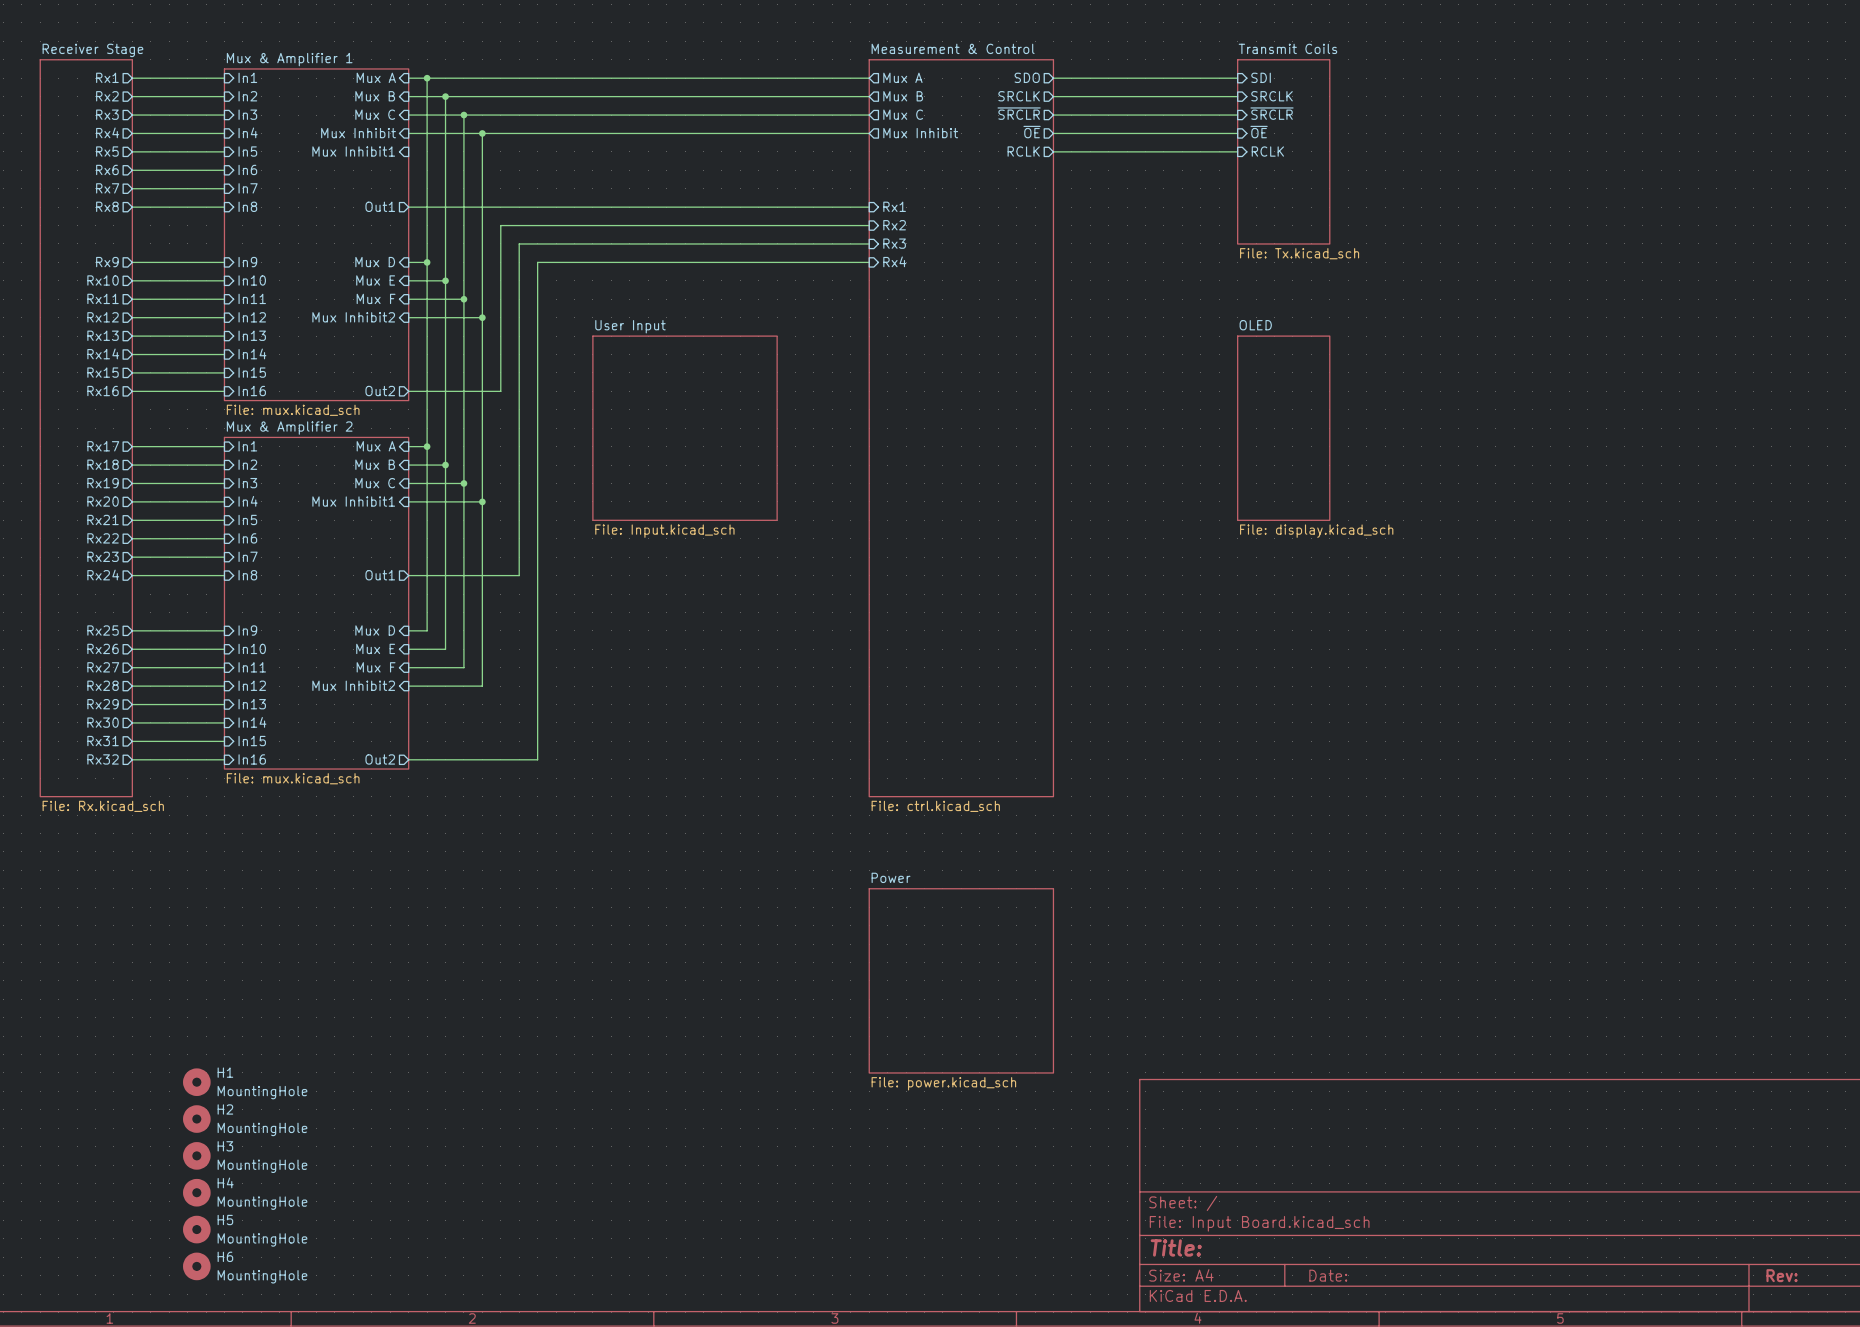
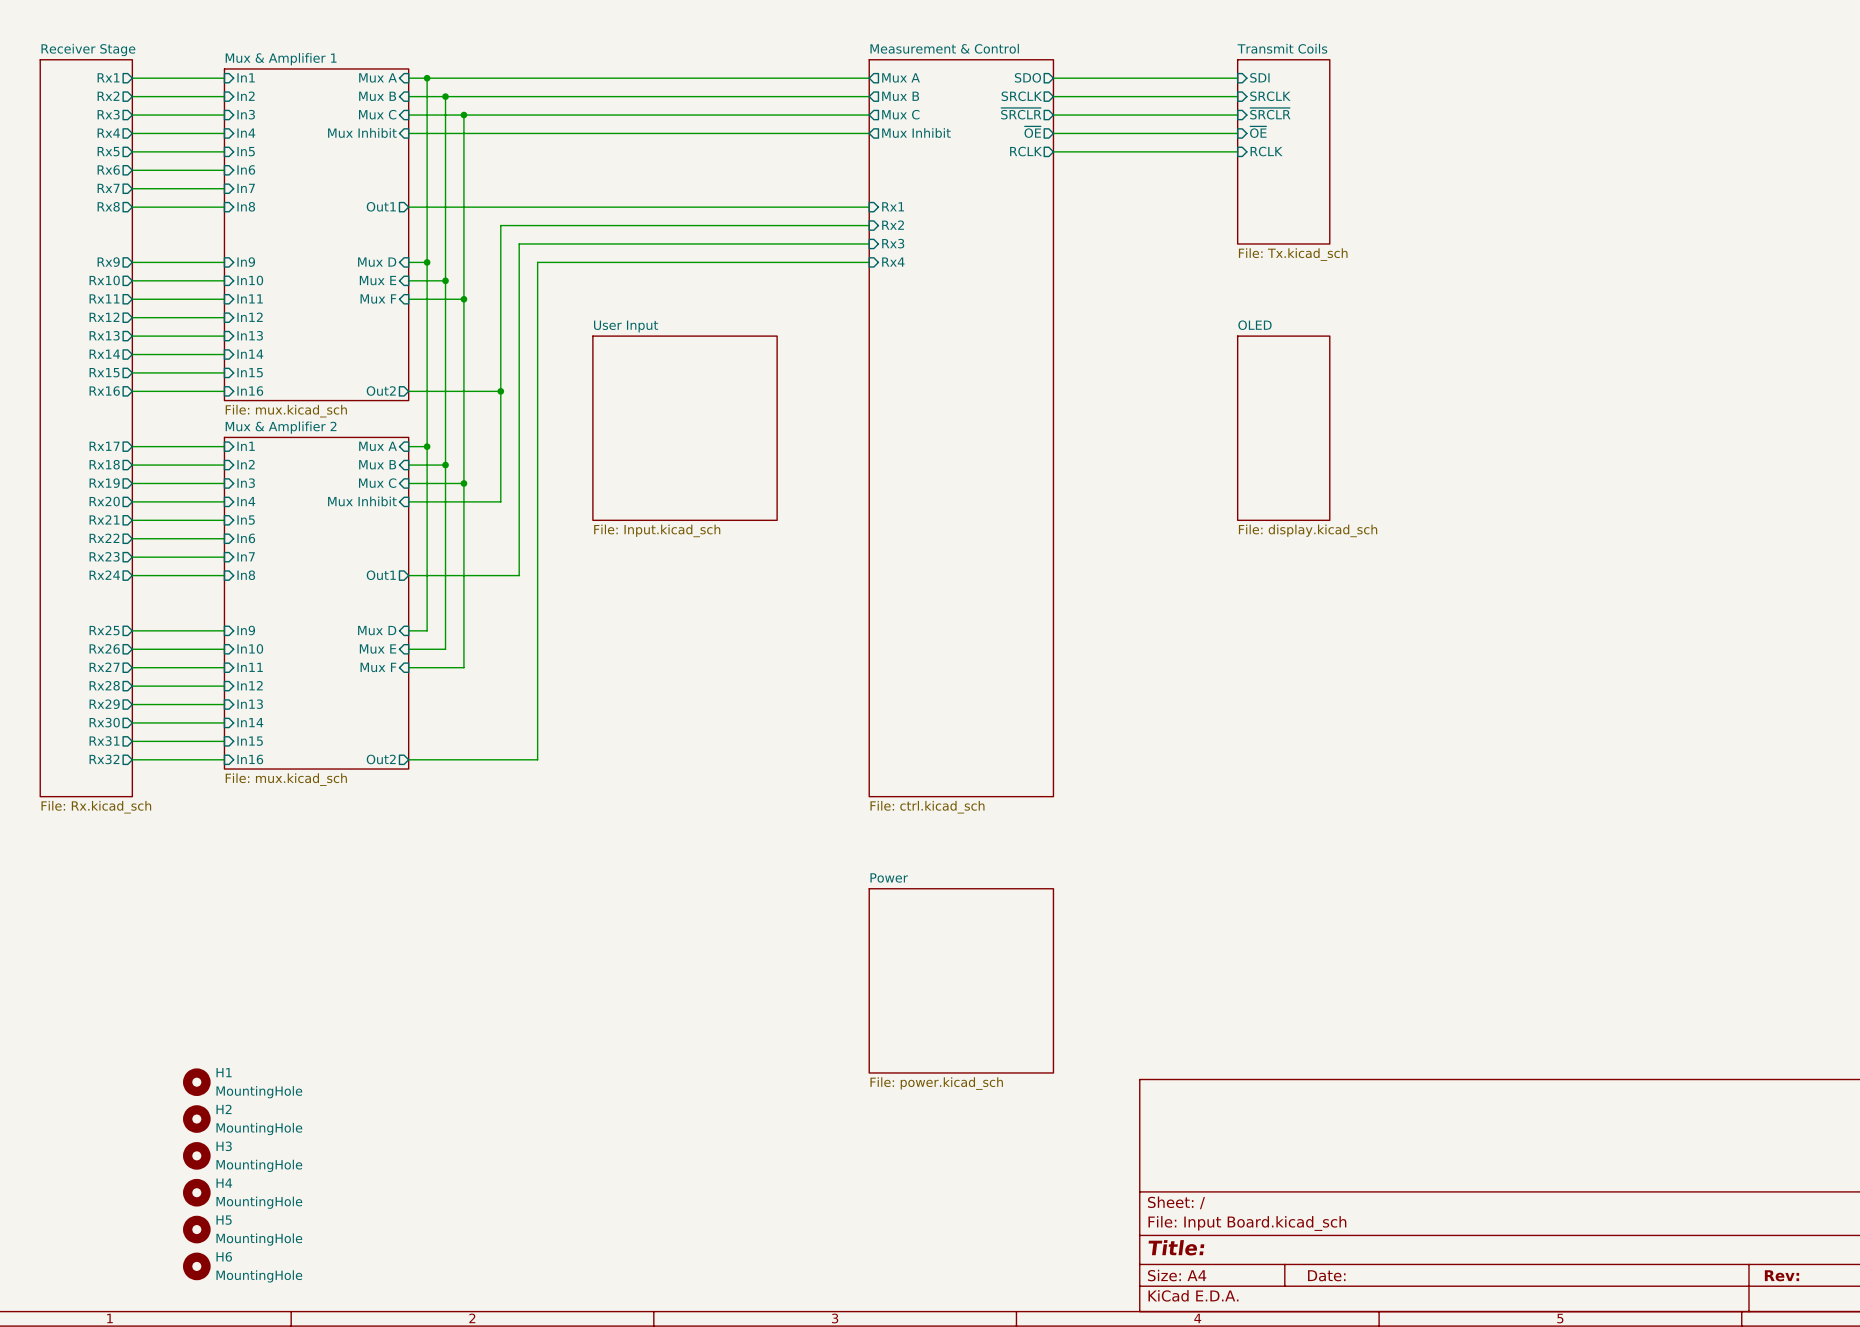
wire: (482, 133) (482, 686) (408, 686) -> none
junction: (482, 133) -> none
sheet pin: Mux Inhibit1 (353, 151) -> none
sheet pin: Mux Inhibit2 (353, 317) -> none
wire: (408, 317) (482, 317) -> none
junction: (482, 317) -> none
wire: none -> (500, 391) (500, 501) (482, 501)
junction: none -> (500, 391)
sheet pin: Mux Inhibit1 (353, 501) -> Mux Inhibit (362, 501)
junction: (482, 501) -> none
sheet pin: Mux Inhibit2 (353, 685) -> none

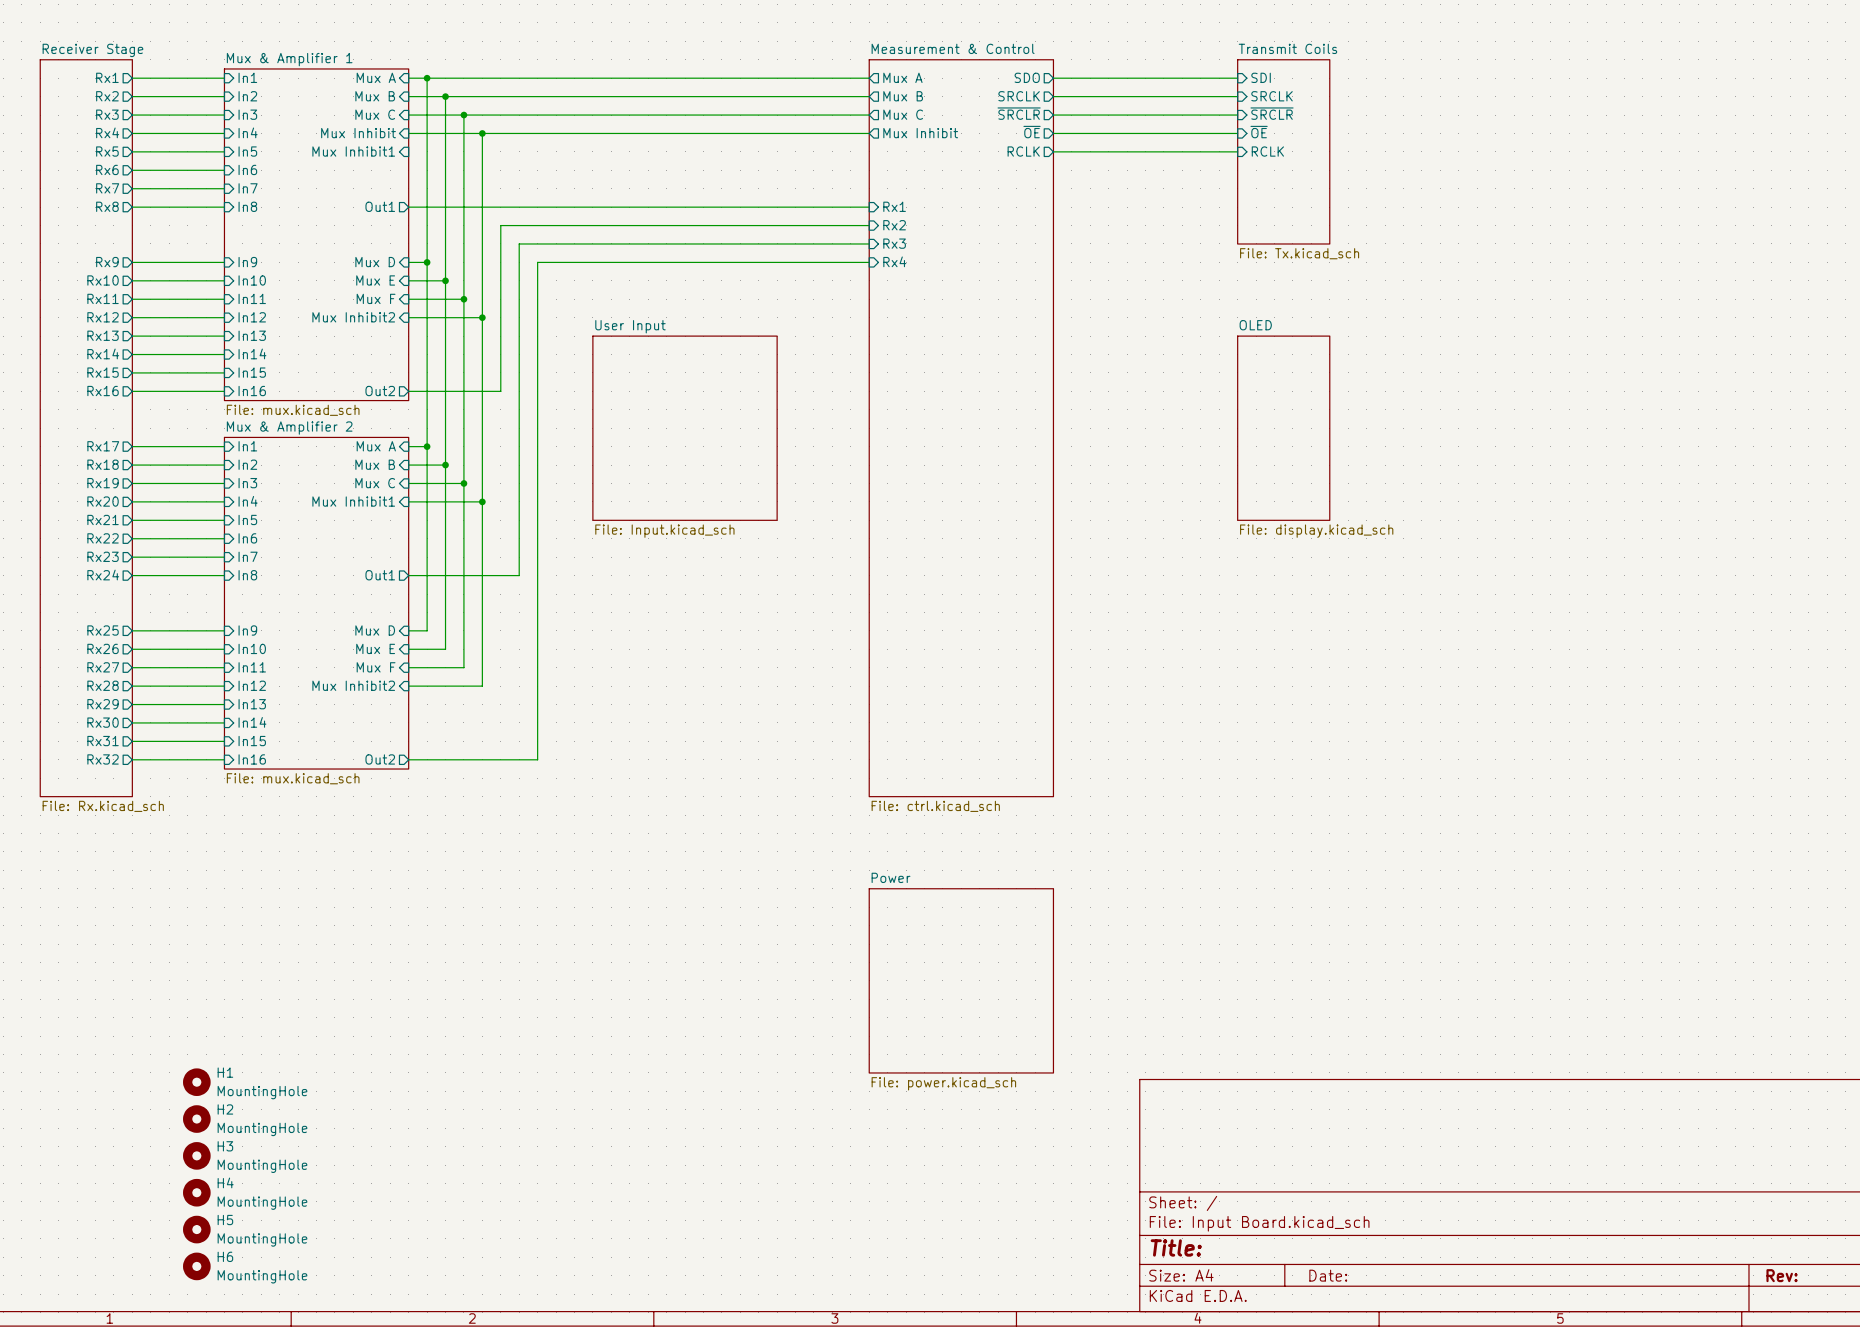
wire: none -> (482, 133) (482, 686) (408, 686)
junction: none -> (482, 133)
sheet pin: none -> Mux Inhibit1 (353, 151)
sheet pin: none -> Mux Inhibit2 (353, 317)
wire: none -> (408, 317) (482, 317)
junction: none -> (482, 317)
wire: (500, 391) (500, 501) (482, 501) -> none
junction: (500, 391) -> none
sheet pin: Mux Inhibit (362, 501) -> Mux Inhibit1 (353, 501)
junction: none -> (482, 501)
sheet pin: none -> Mux Inhibit2 (353, 685)

